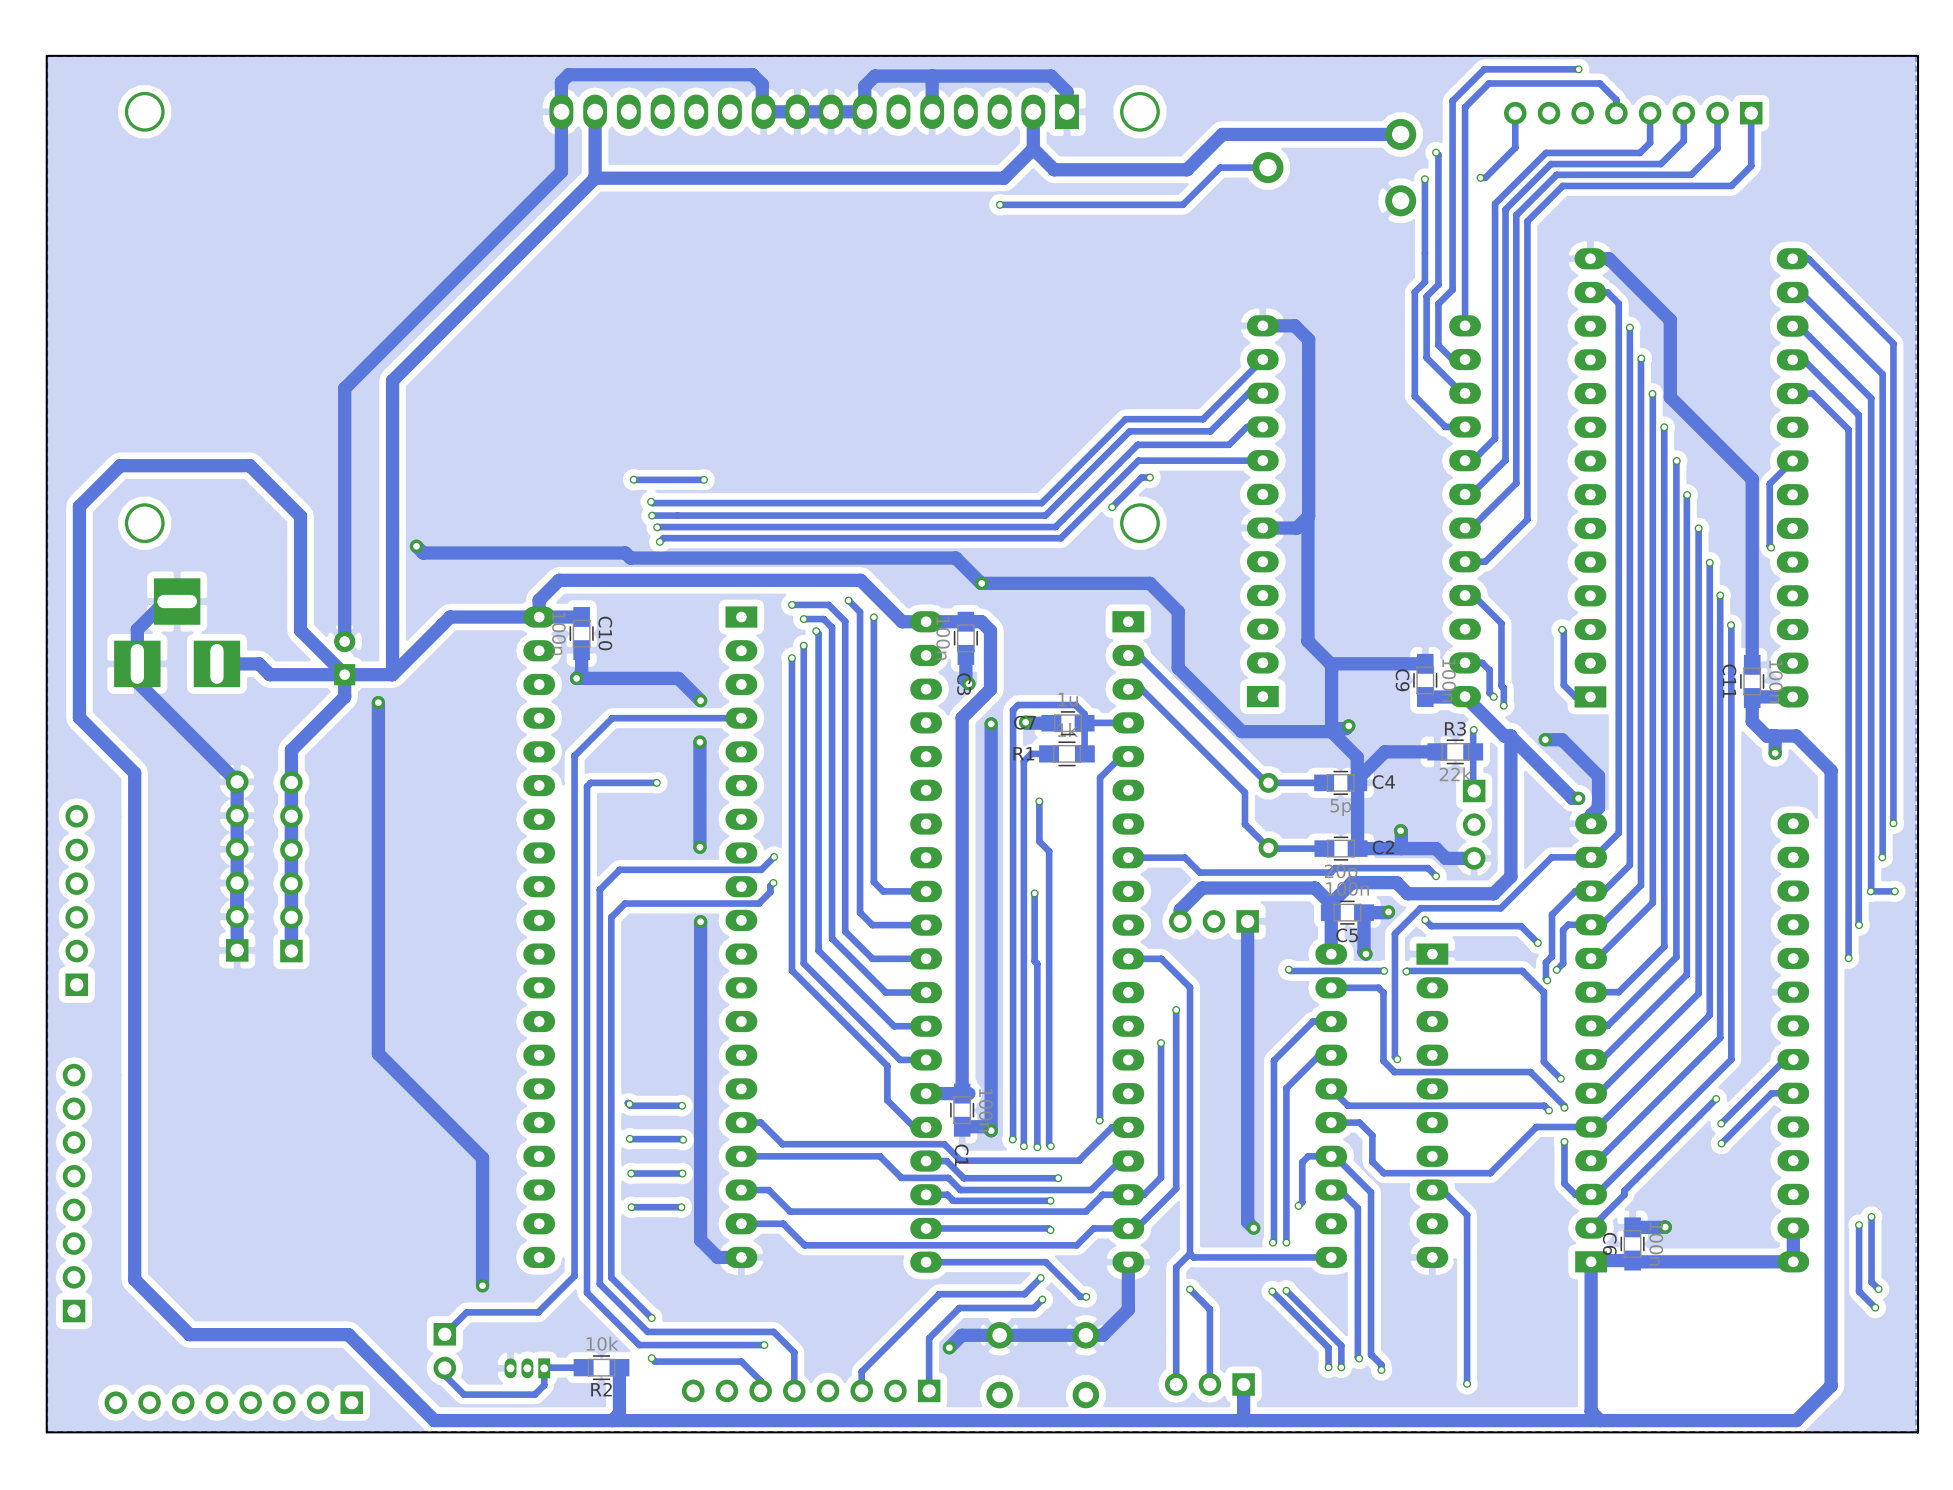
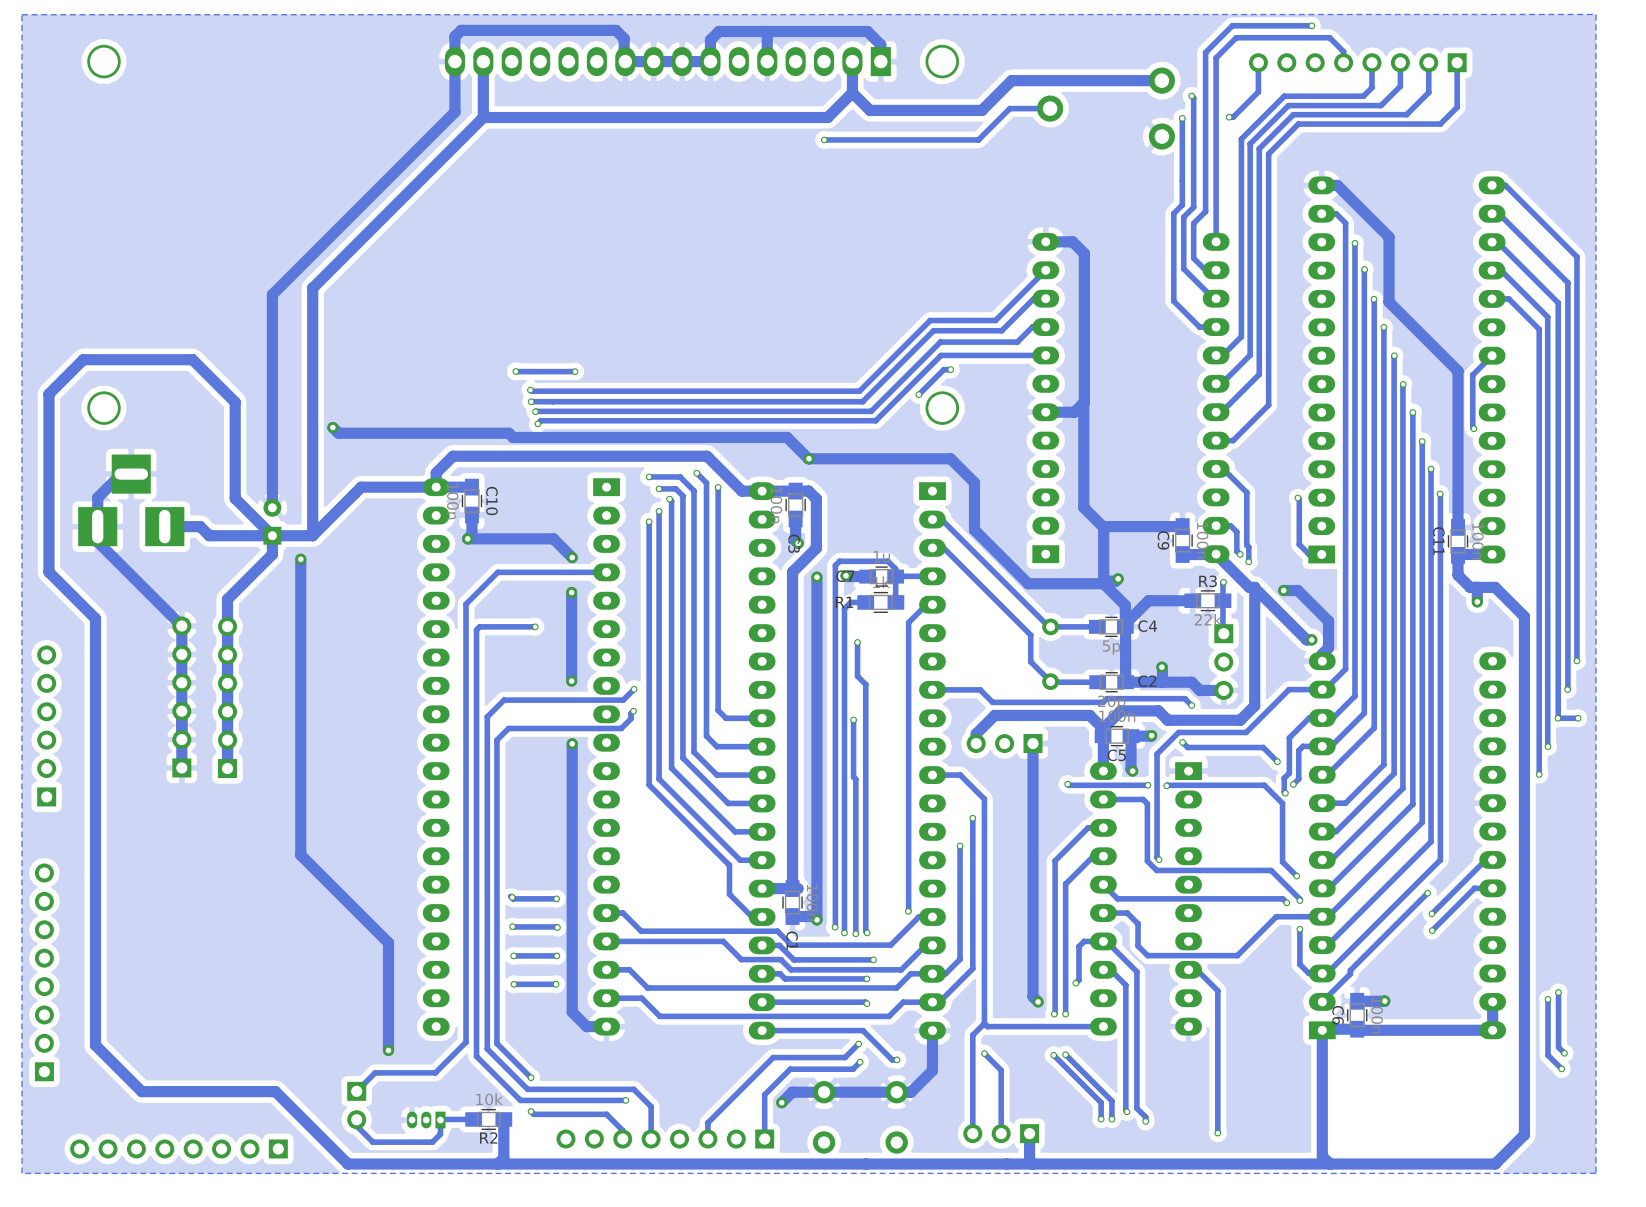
board edge: (1918, 55) (1918, 1432) (46, 1432) (46, 55) (1917, 55) -> none

